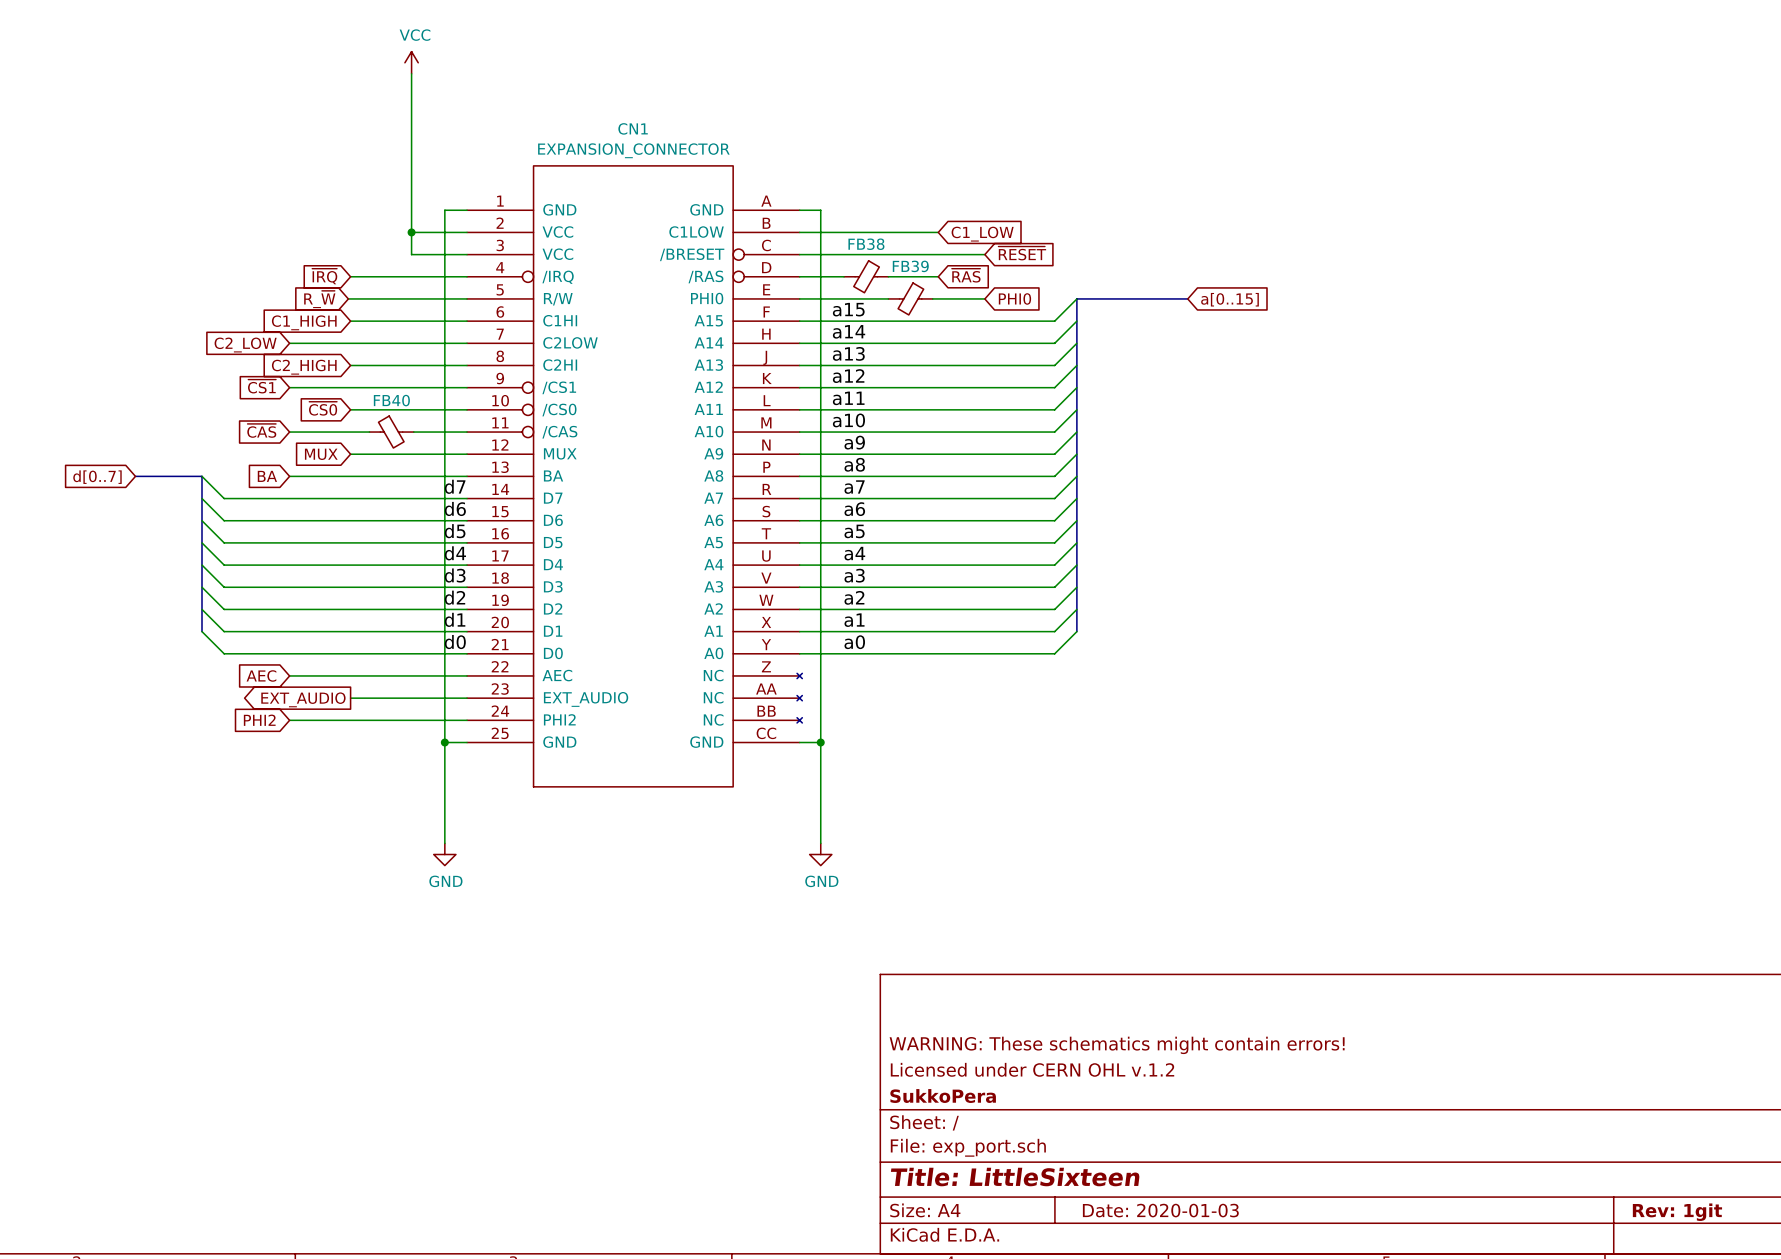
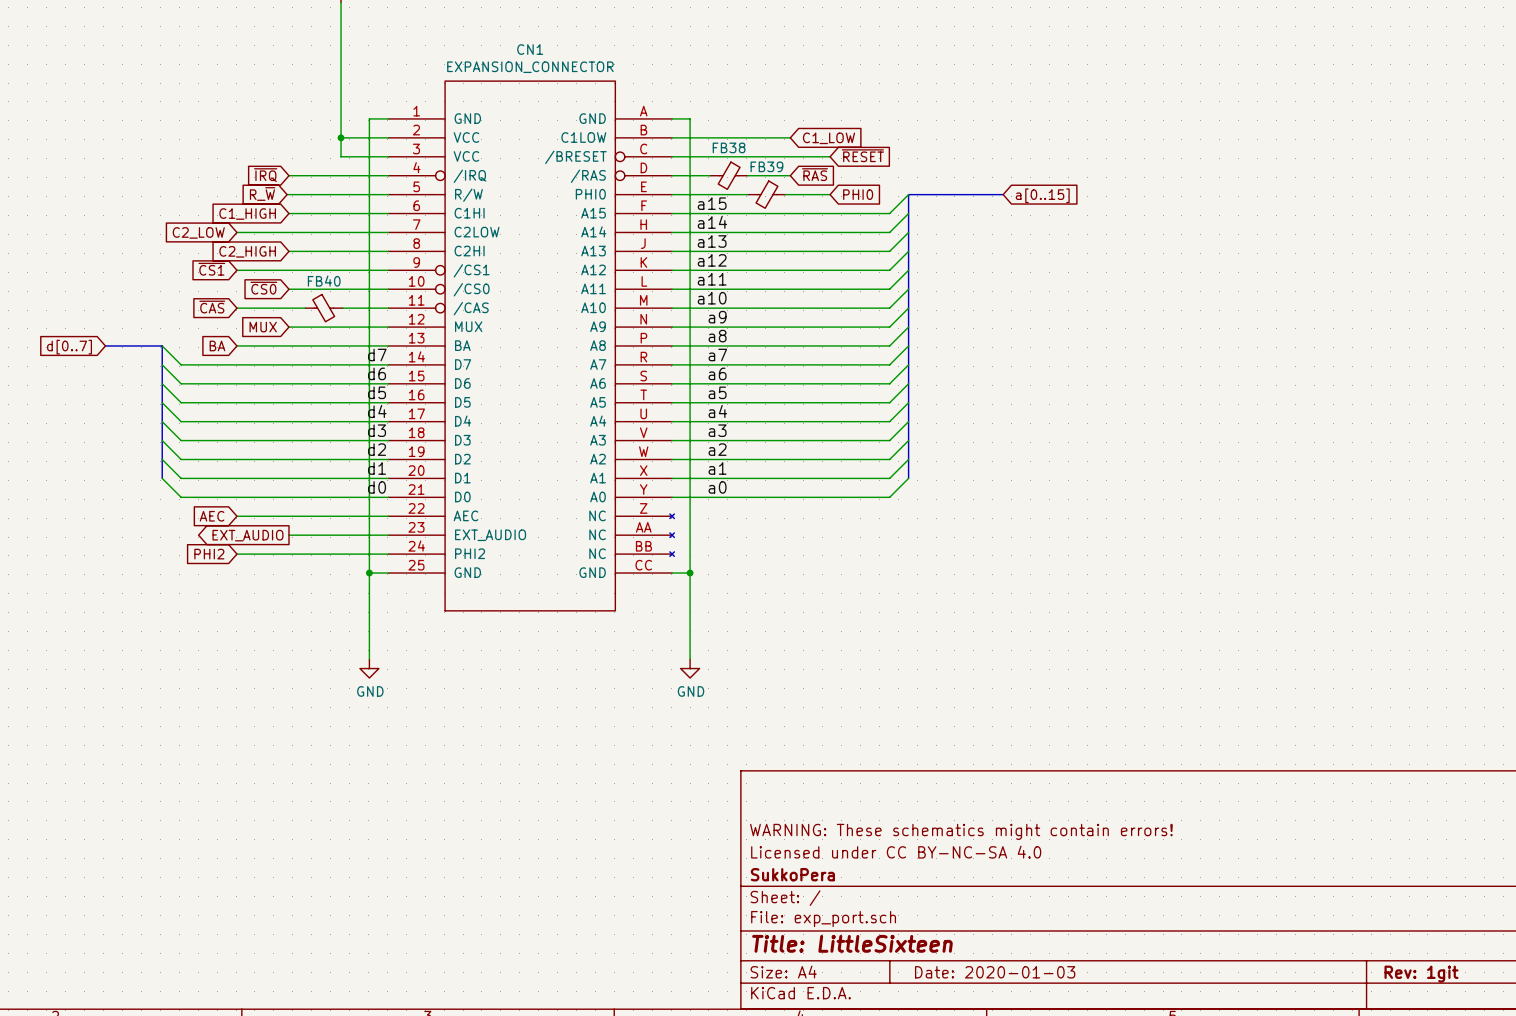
title block: Licensed under CERN OHL v.1.2 (1032, 1069) -> Licensed under CC BY-NC-SA 4.0 (896, 852)

